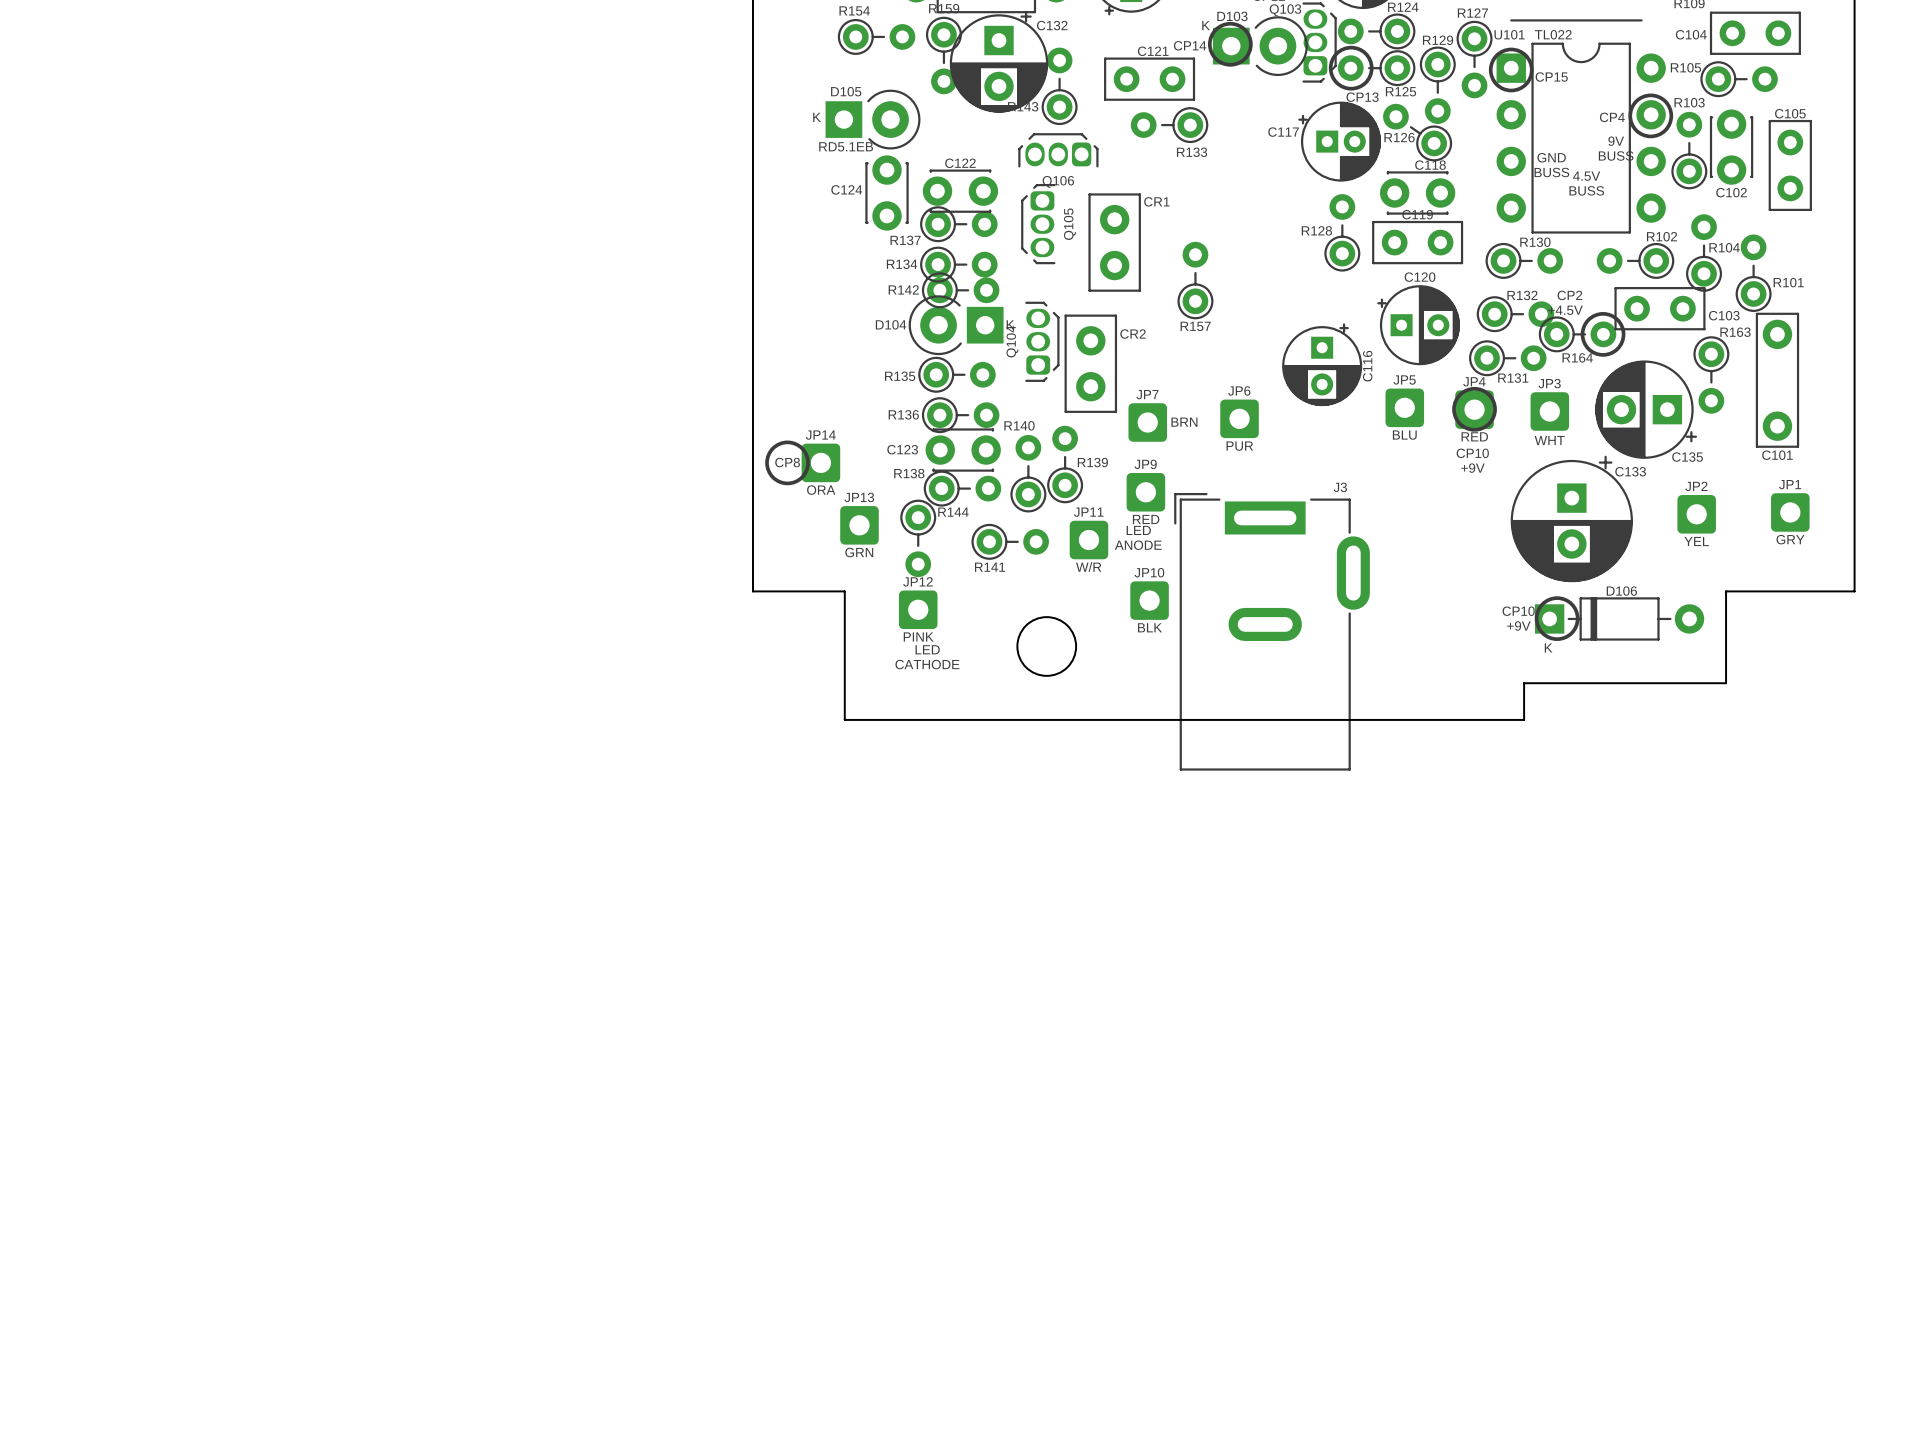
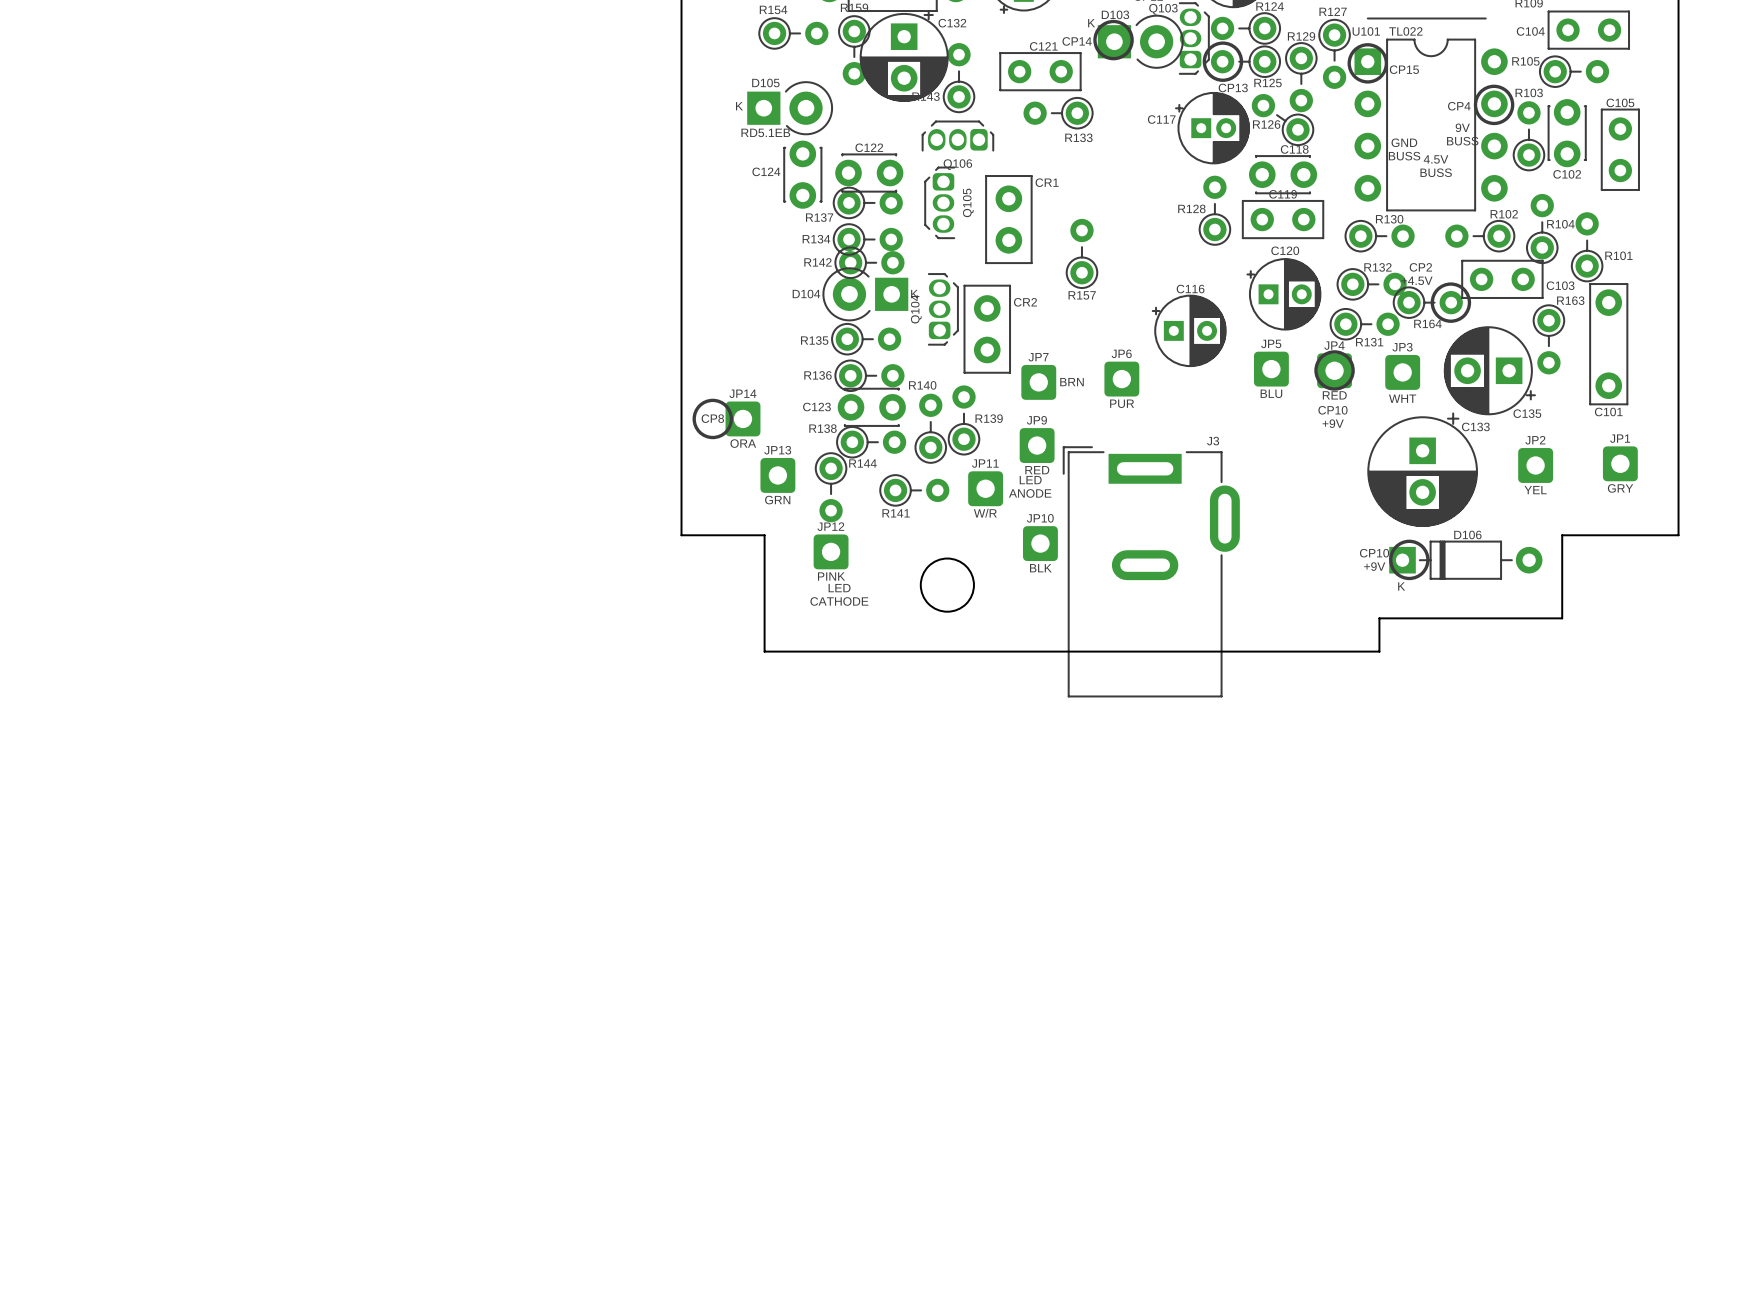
C116 rotation: 0° (1322, 364) -> 90° counterclockwise (1189, 330)

